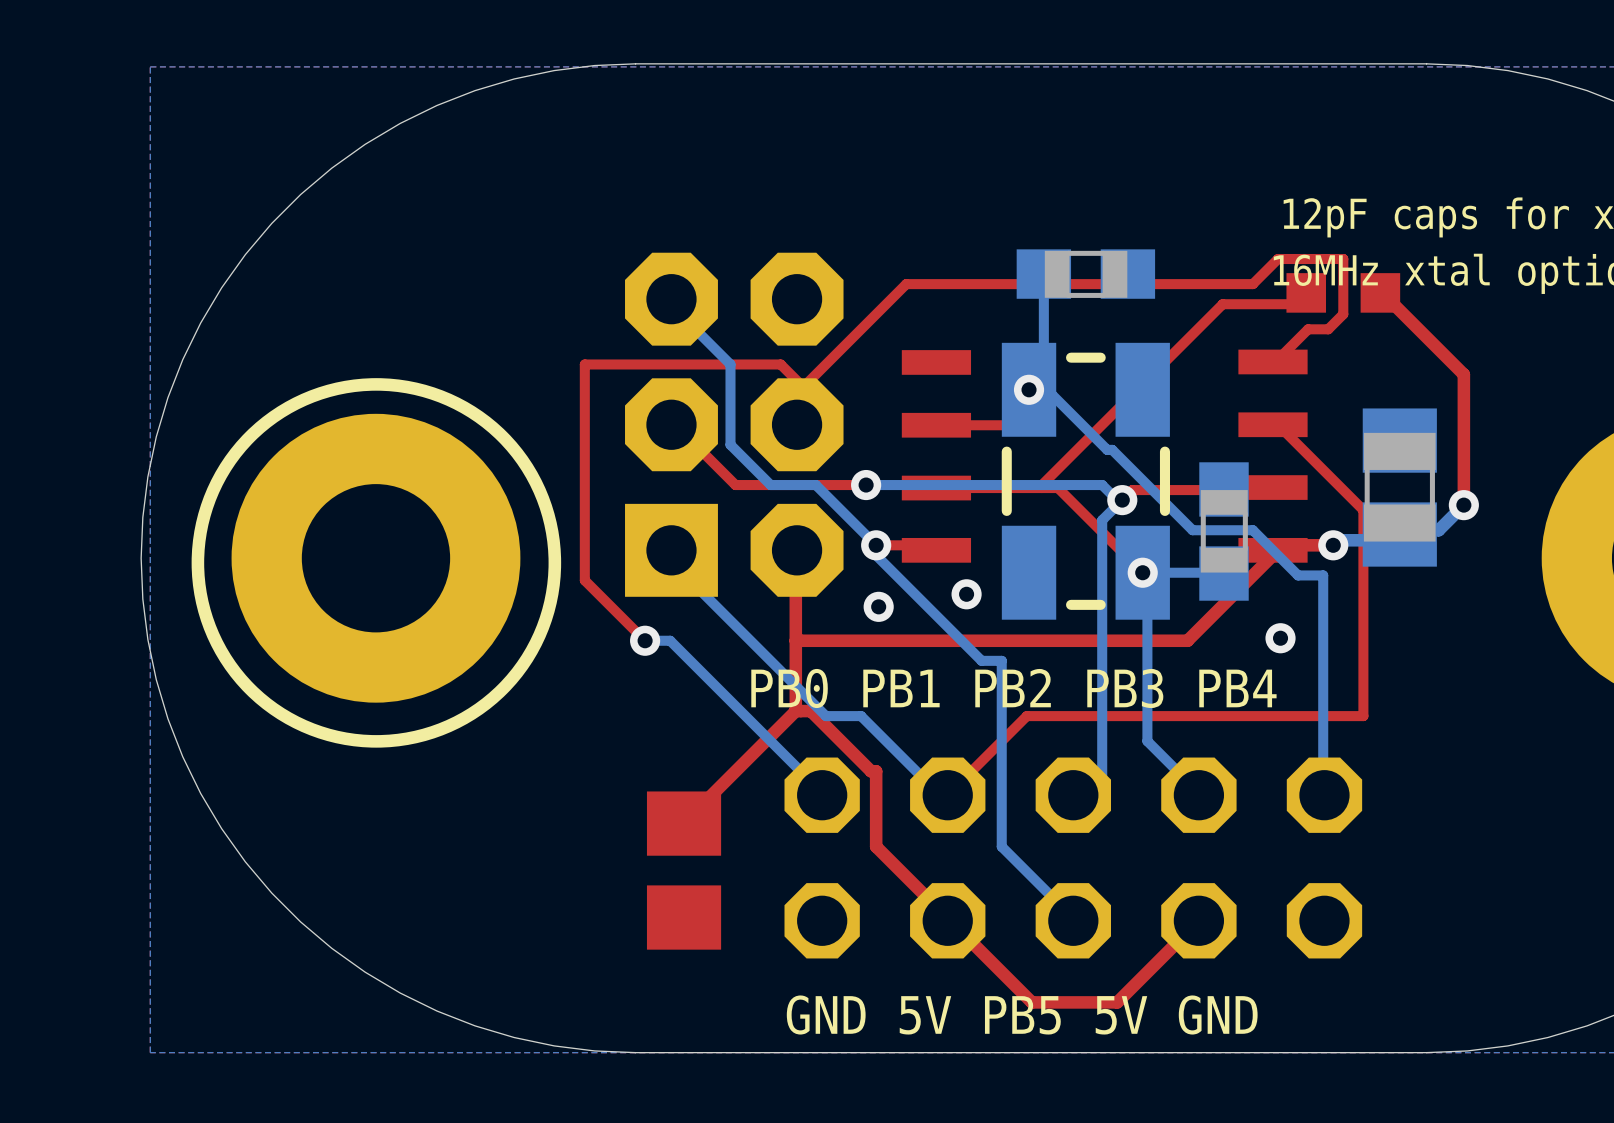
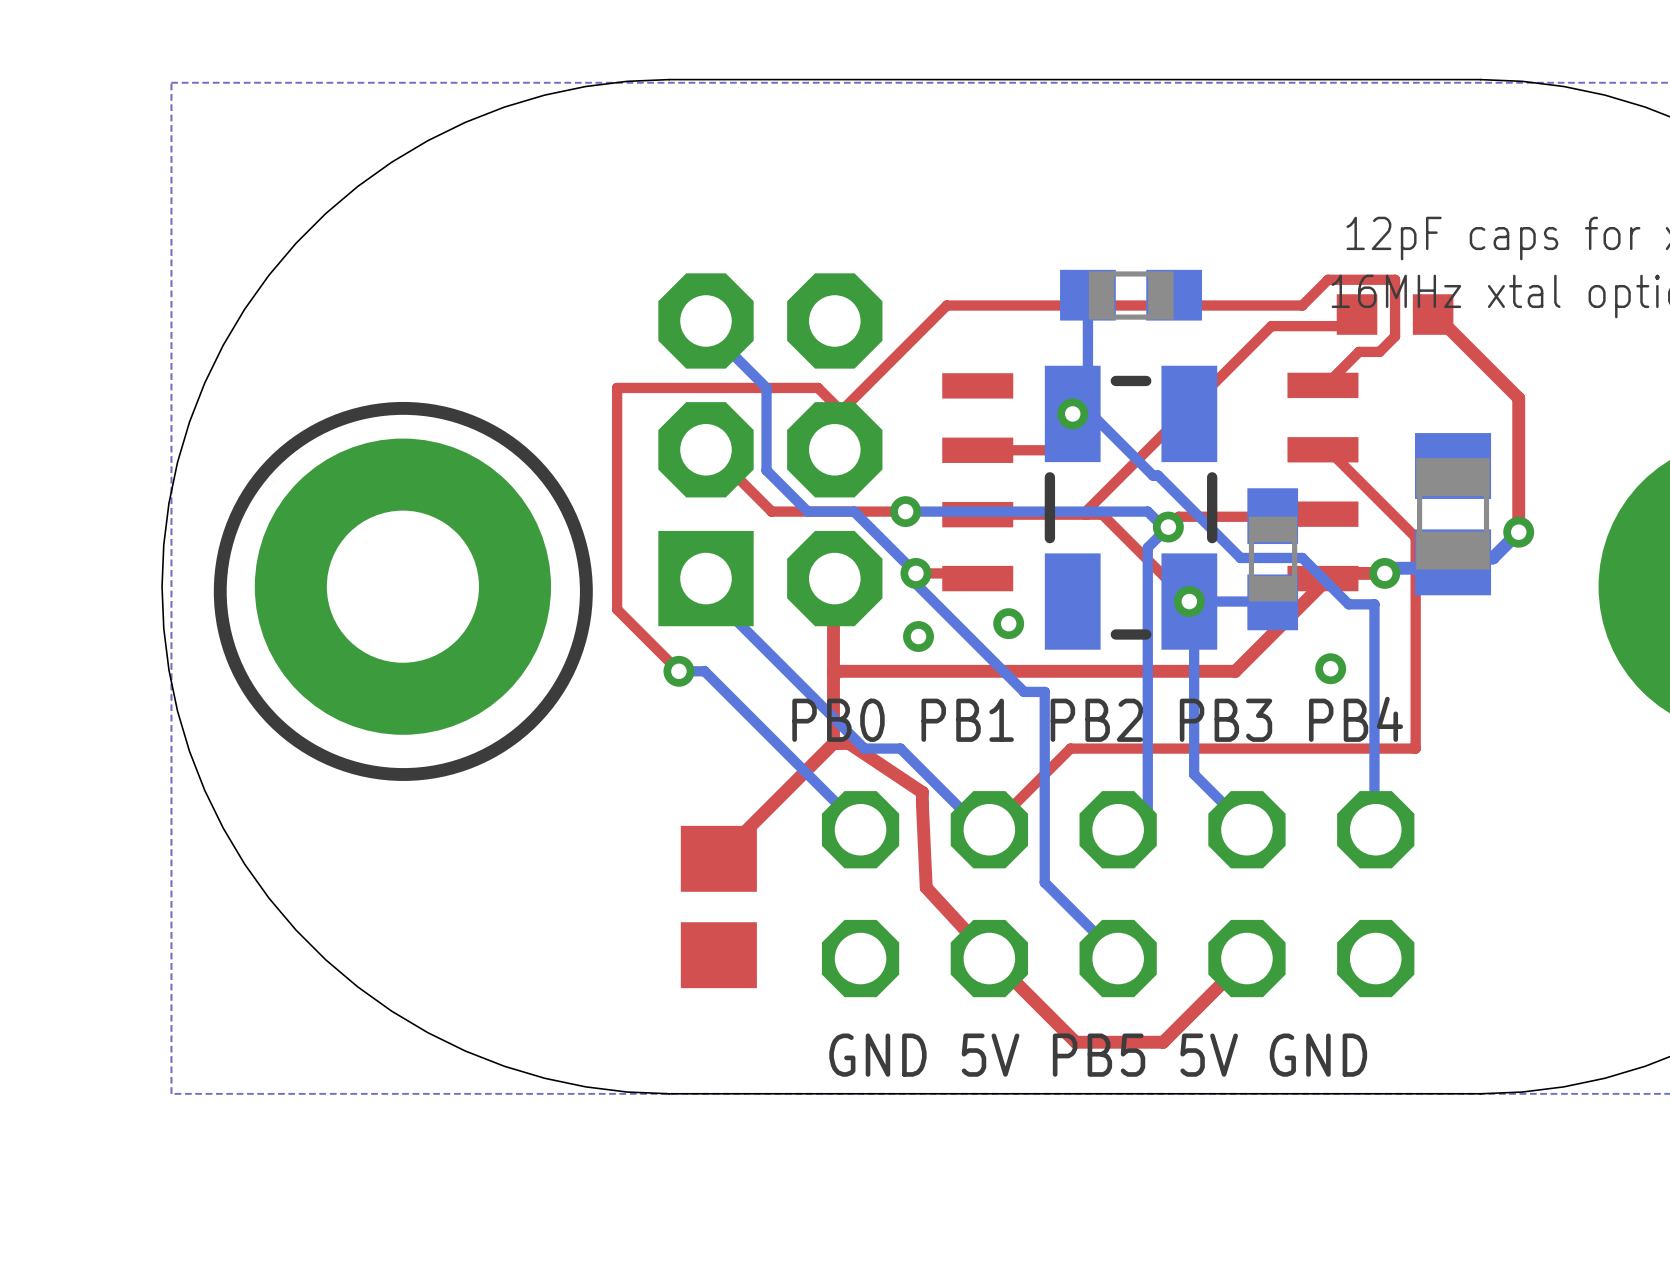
top track: (810, 711) (871, 771) (876, 771) (876, 846) (946, 917) -> (848, 743) (922, 792) (926, 887) (988, 954)

